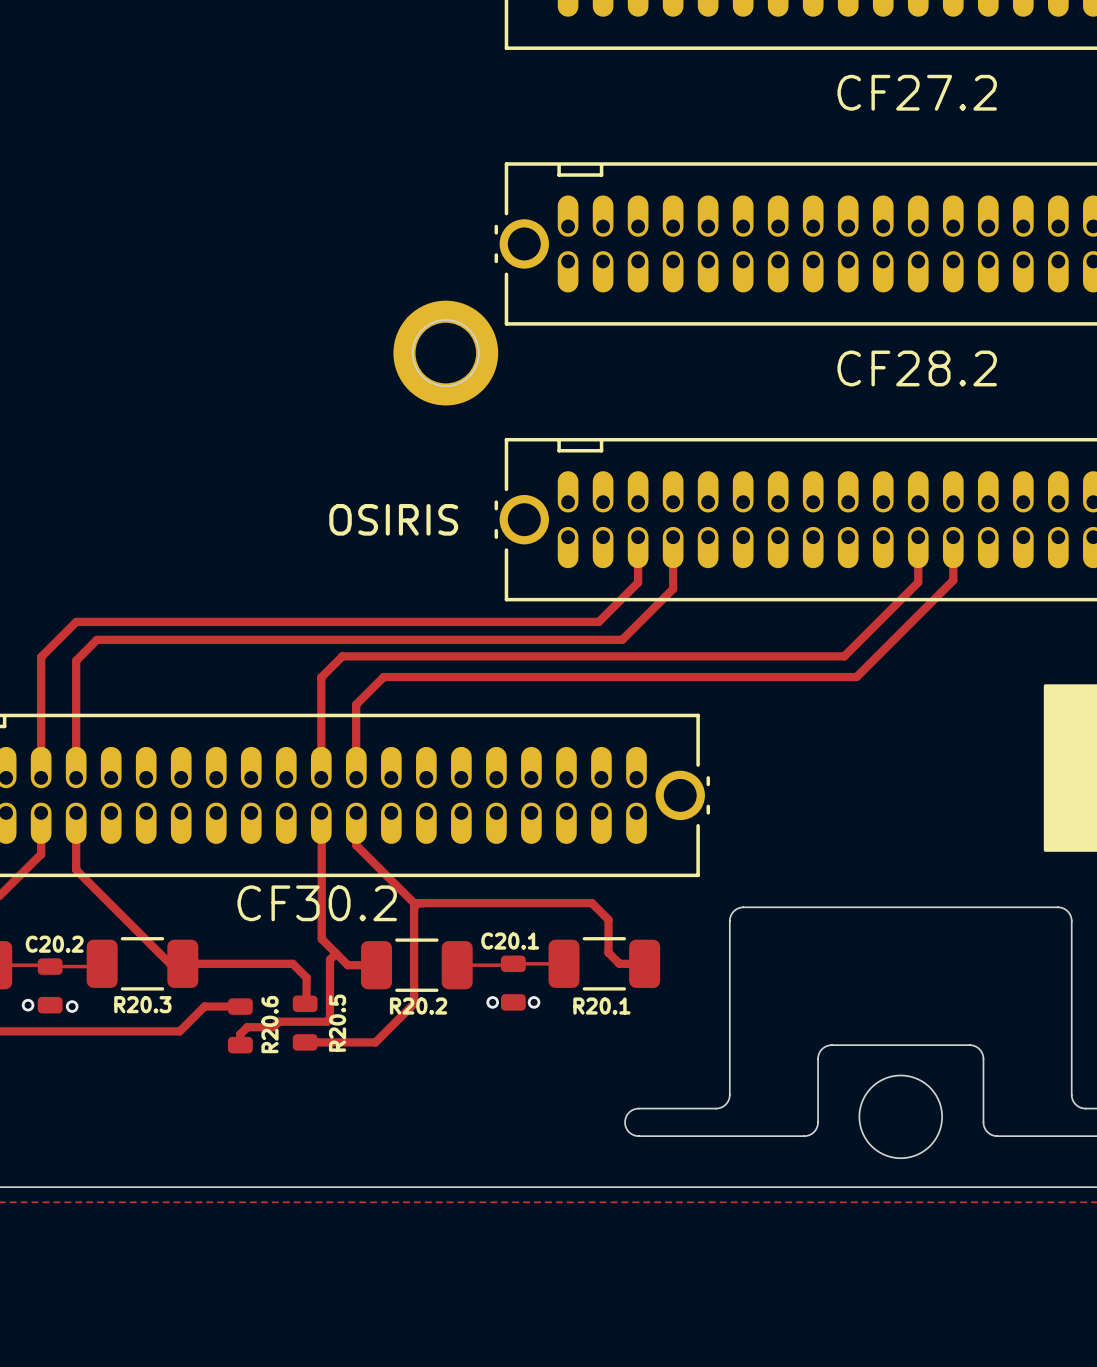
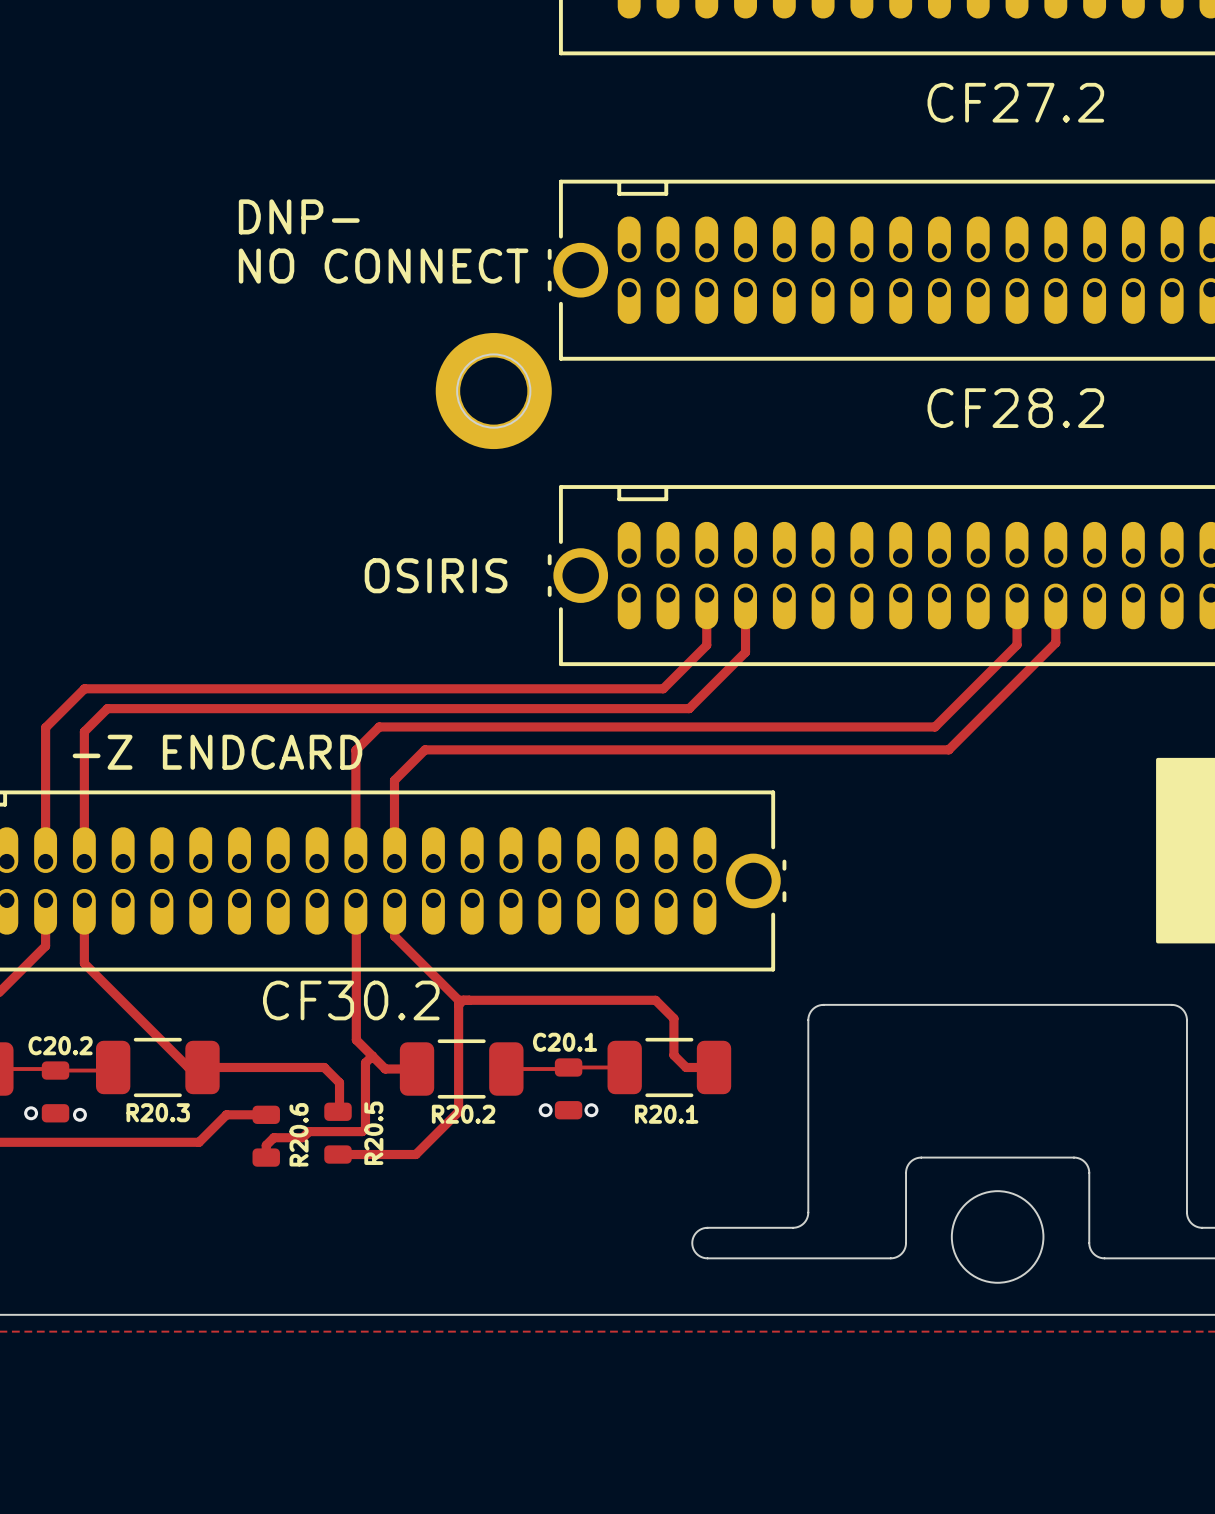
text: none -> DNP- (299, 216)
text: none -> NO CONNECT (383, 266)
text: none -> -Z ENDCARD (217, 752)

